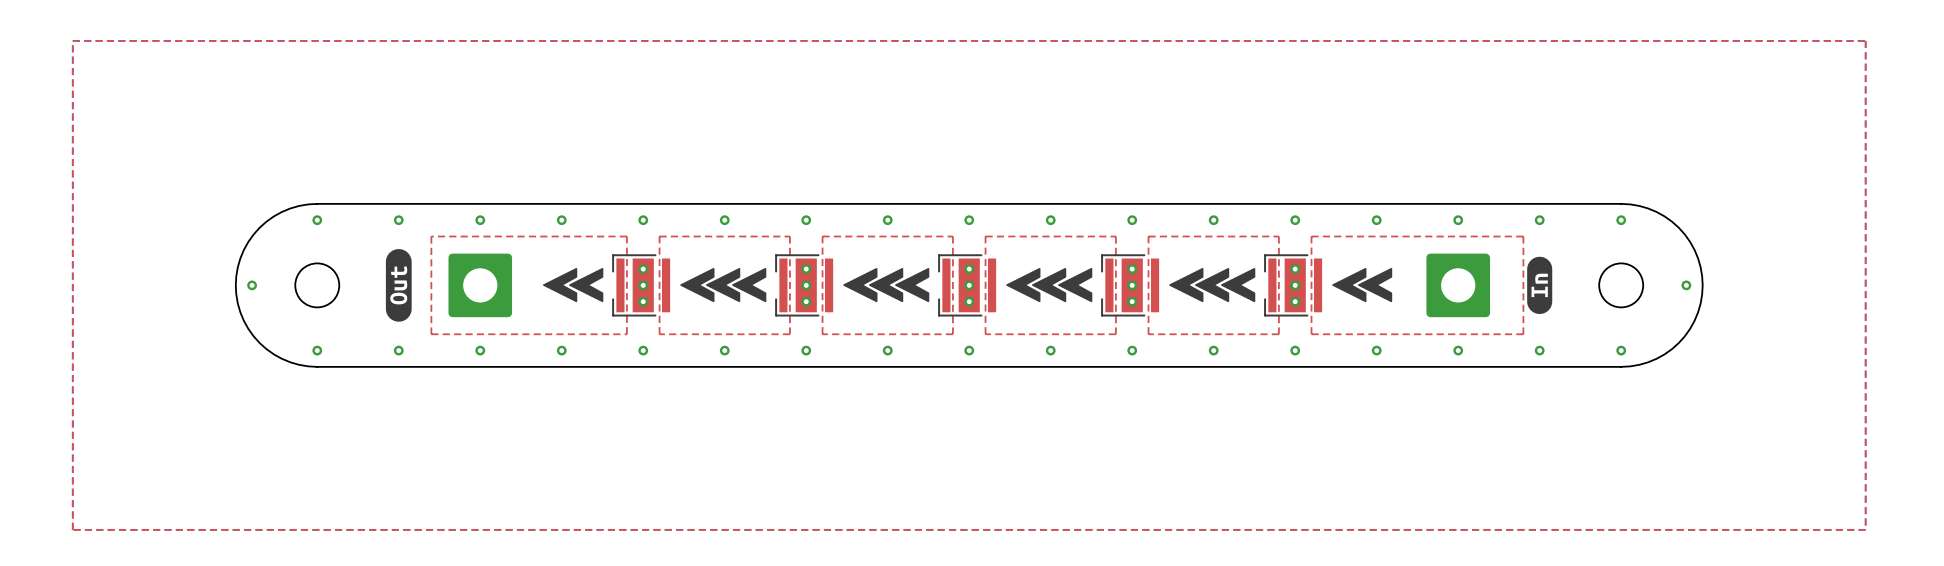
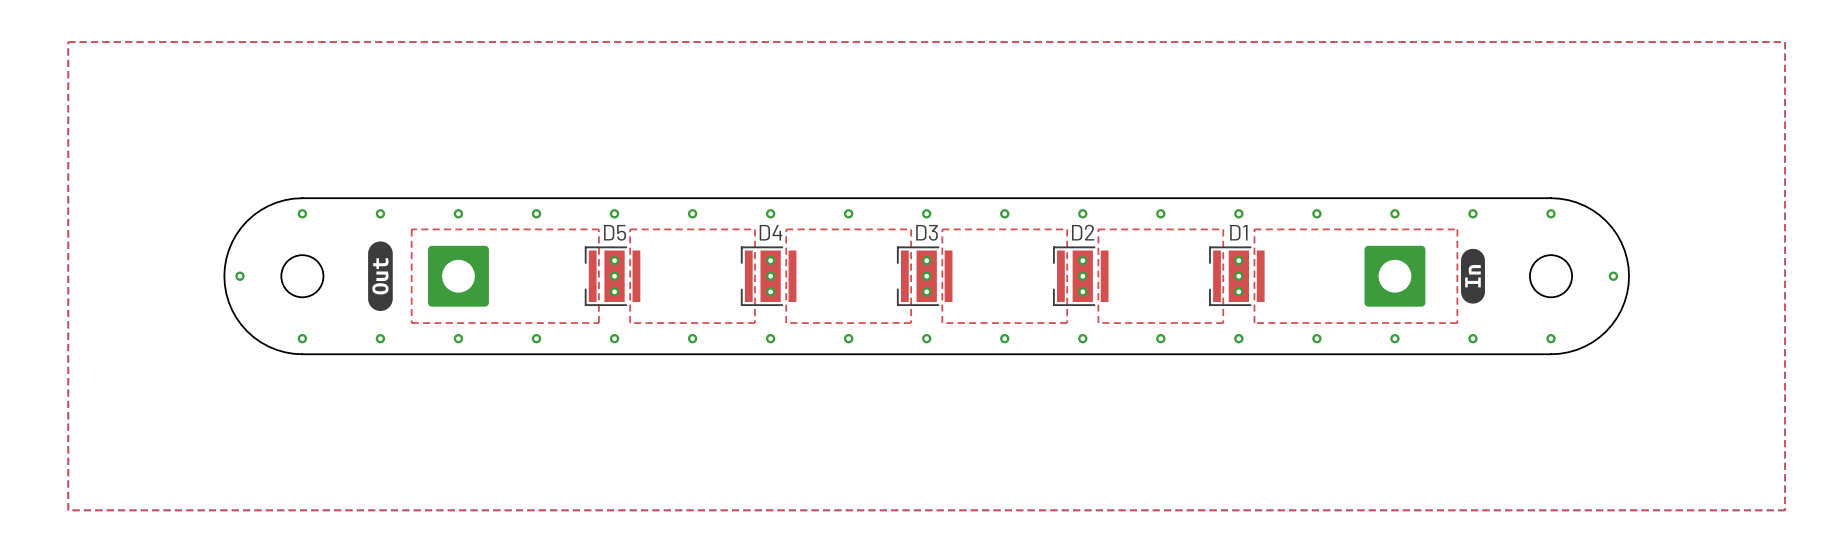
D4 name: none -> D4 (770, 232)
D2 name: none -> D2 (1083, 232)
D1 name: none -> D1 (1238, 232)
D5 name: none -> D5 (615, 232)
D3 name: none -> D3 (927, 232)
drawing: [543, 267, 604, 303] -> none
drawing: [680, 267, 767, 303] -> none
drawing: [843, 267, 930, 303] -> none
drawing: [1006, 267, 1093, 303] -> none
drawing: [1169, 267, 1256, 303] -> none
drawing: [1332, 267, 1393, 303] -> none

